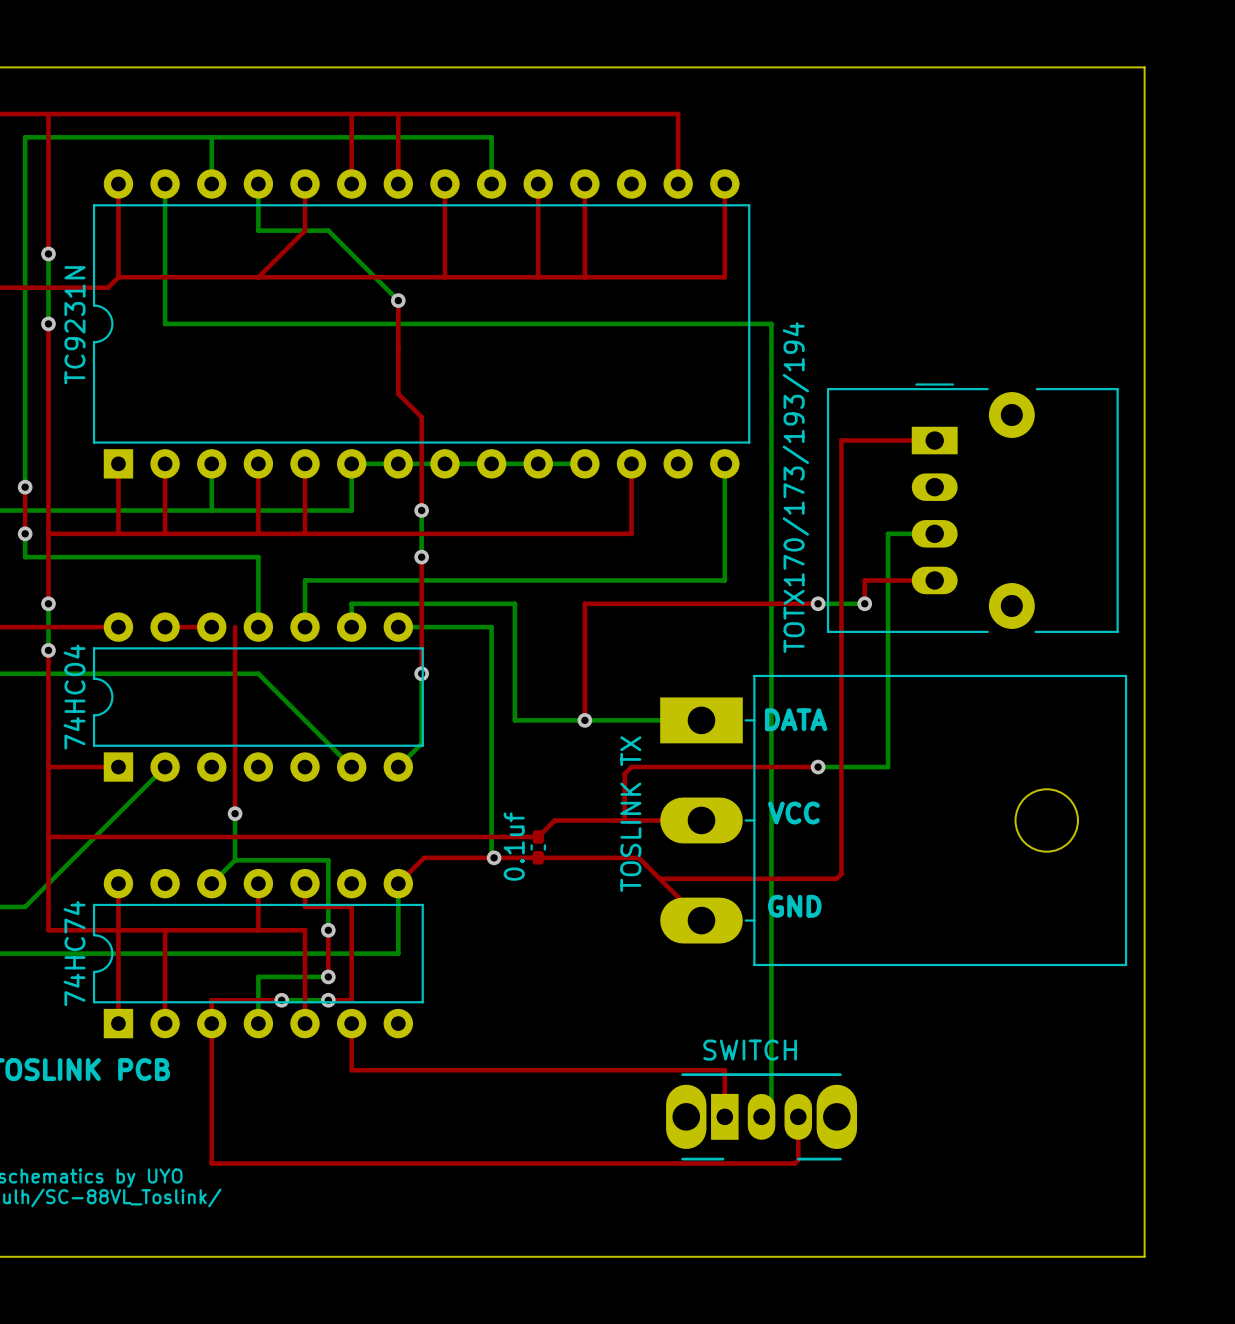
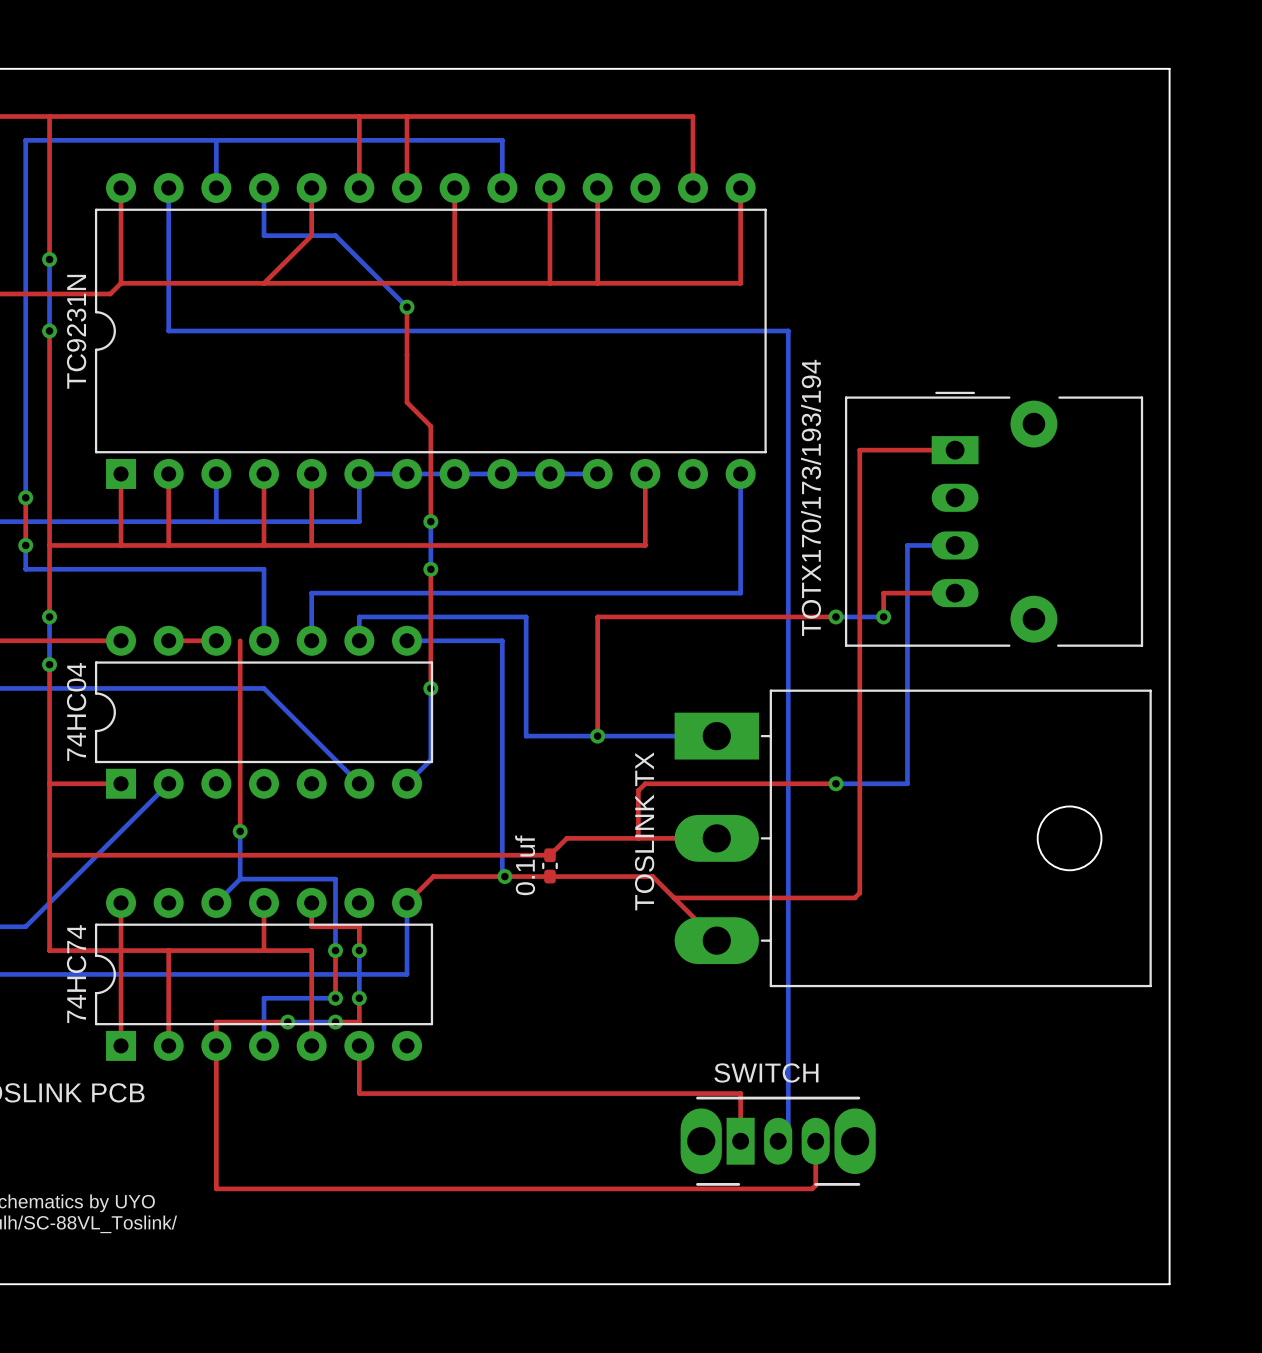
text: DATA (796, 719) -> none
text: VCC (793, 812) -> none
text: GND (794, 906) -> none
top track: (351, 930) (351, 976) -> none
bottom track: none -> (359, 950) (359, 998)
via: none -> (359, 950)
via: none -> (359, 998)

